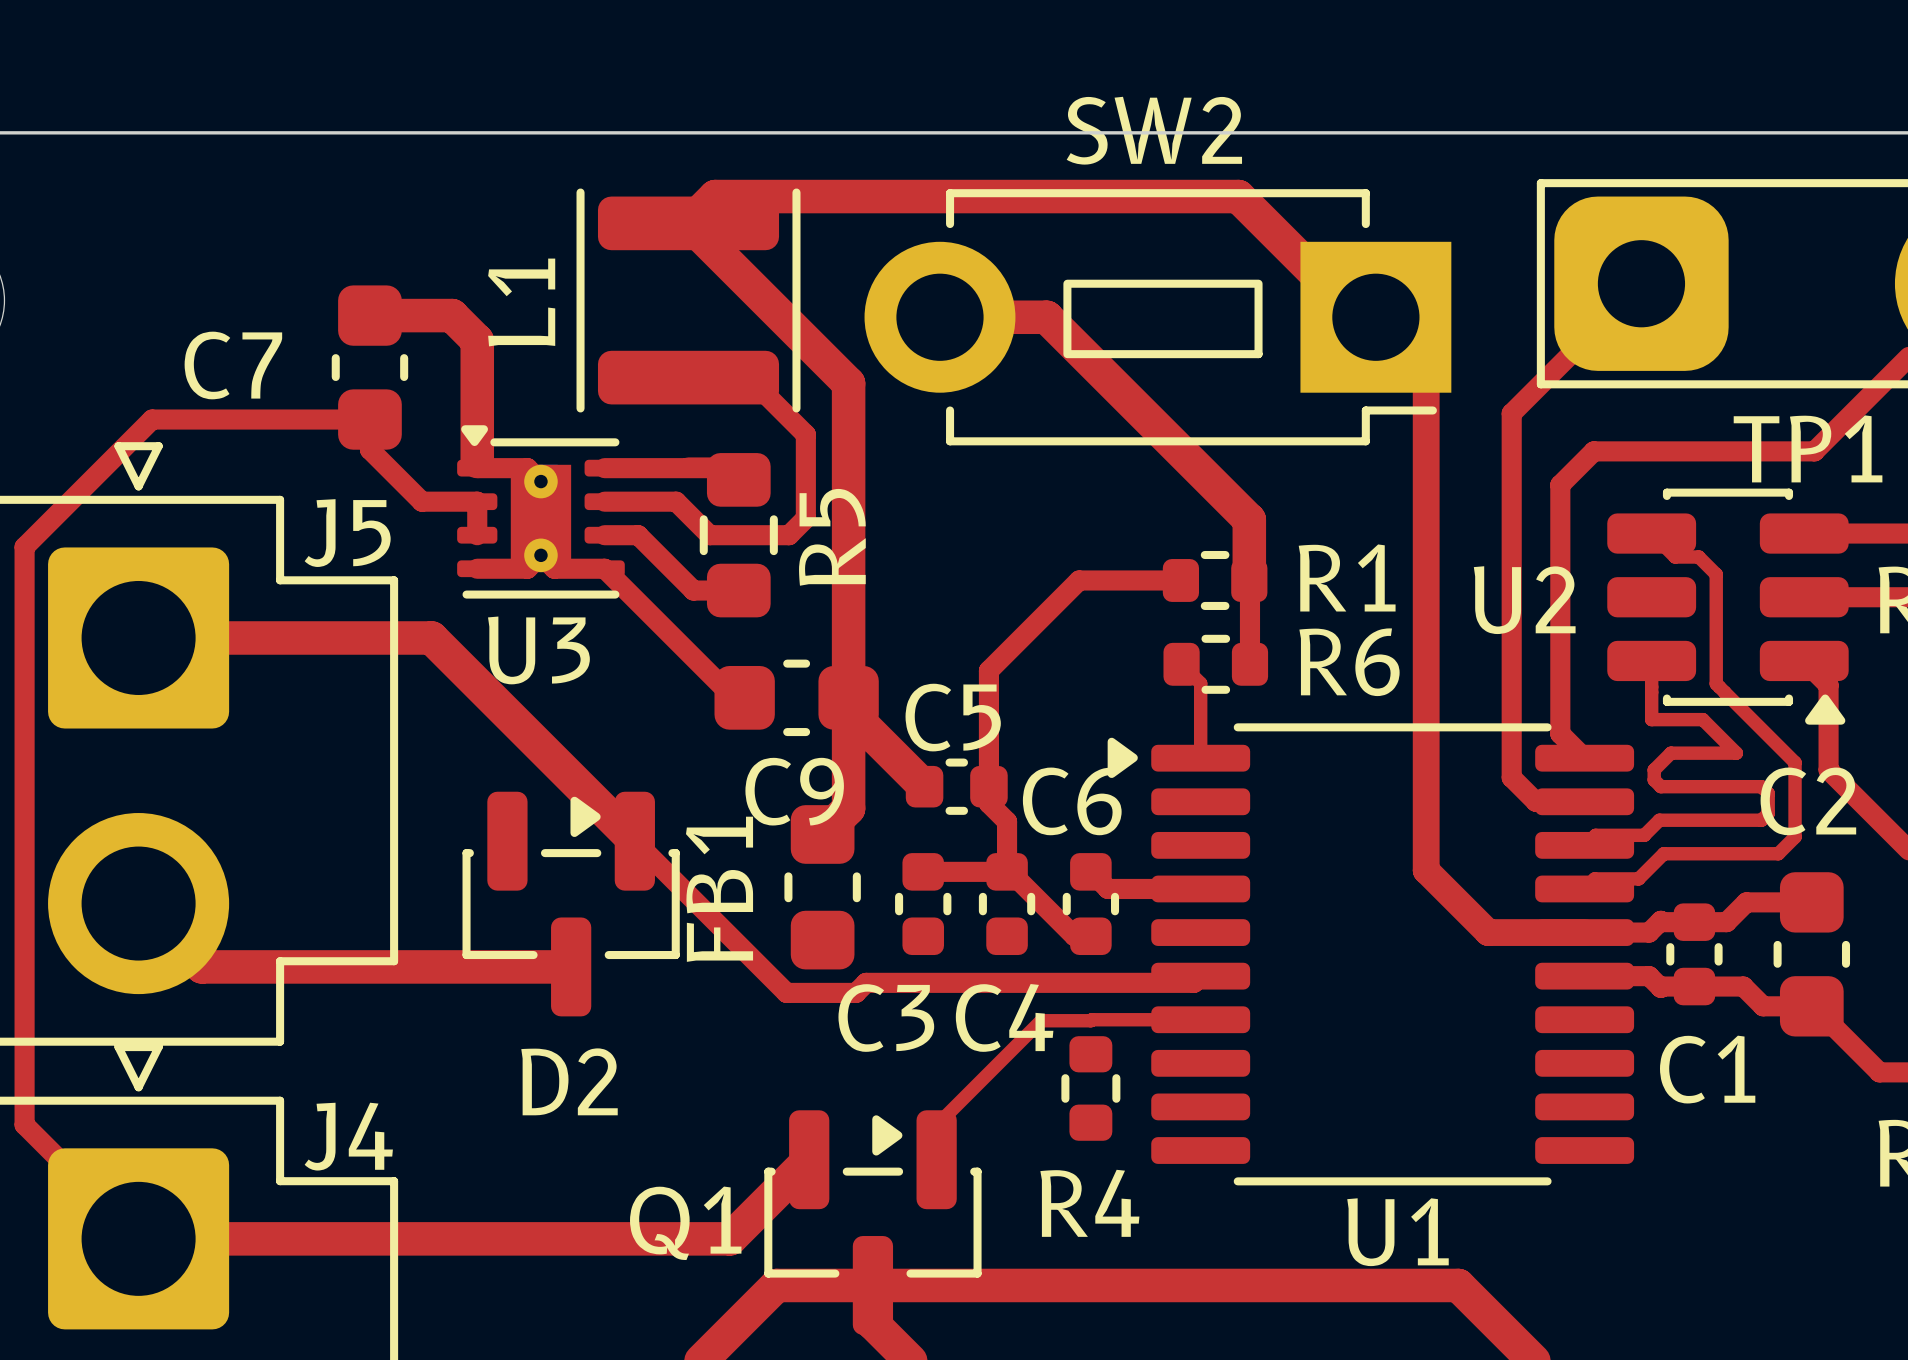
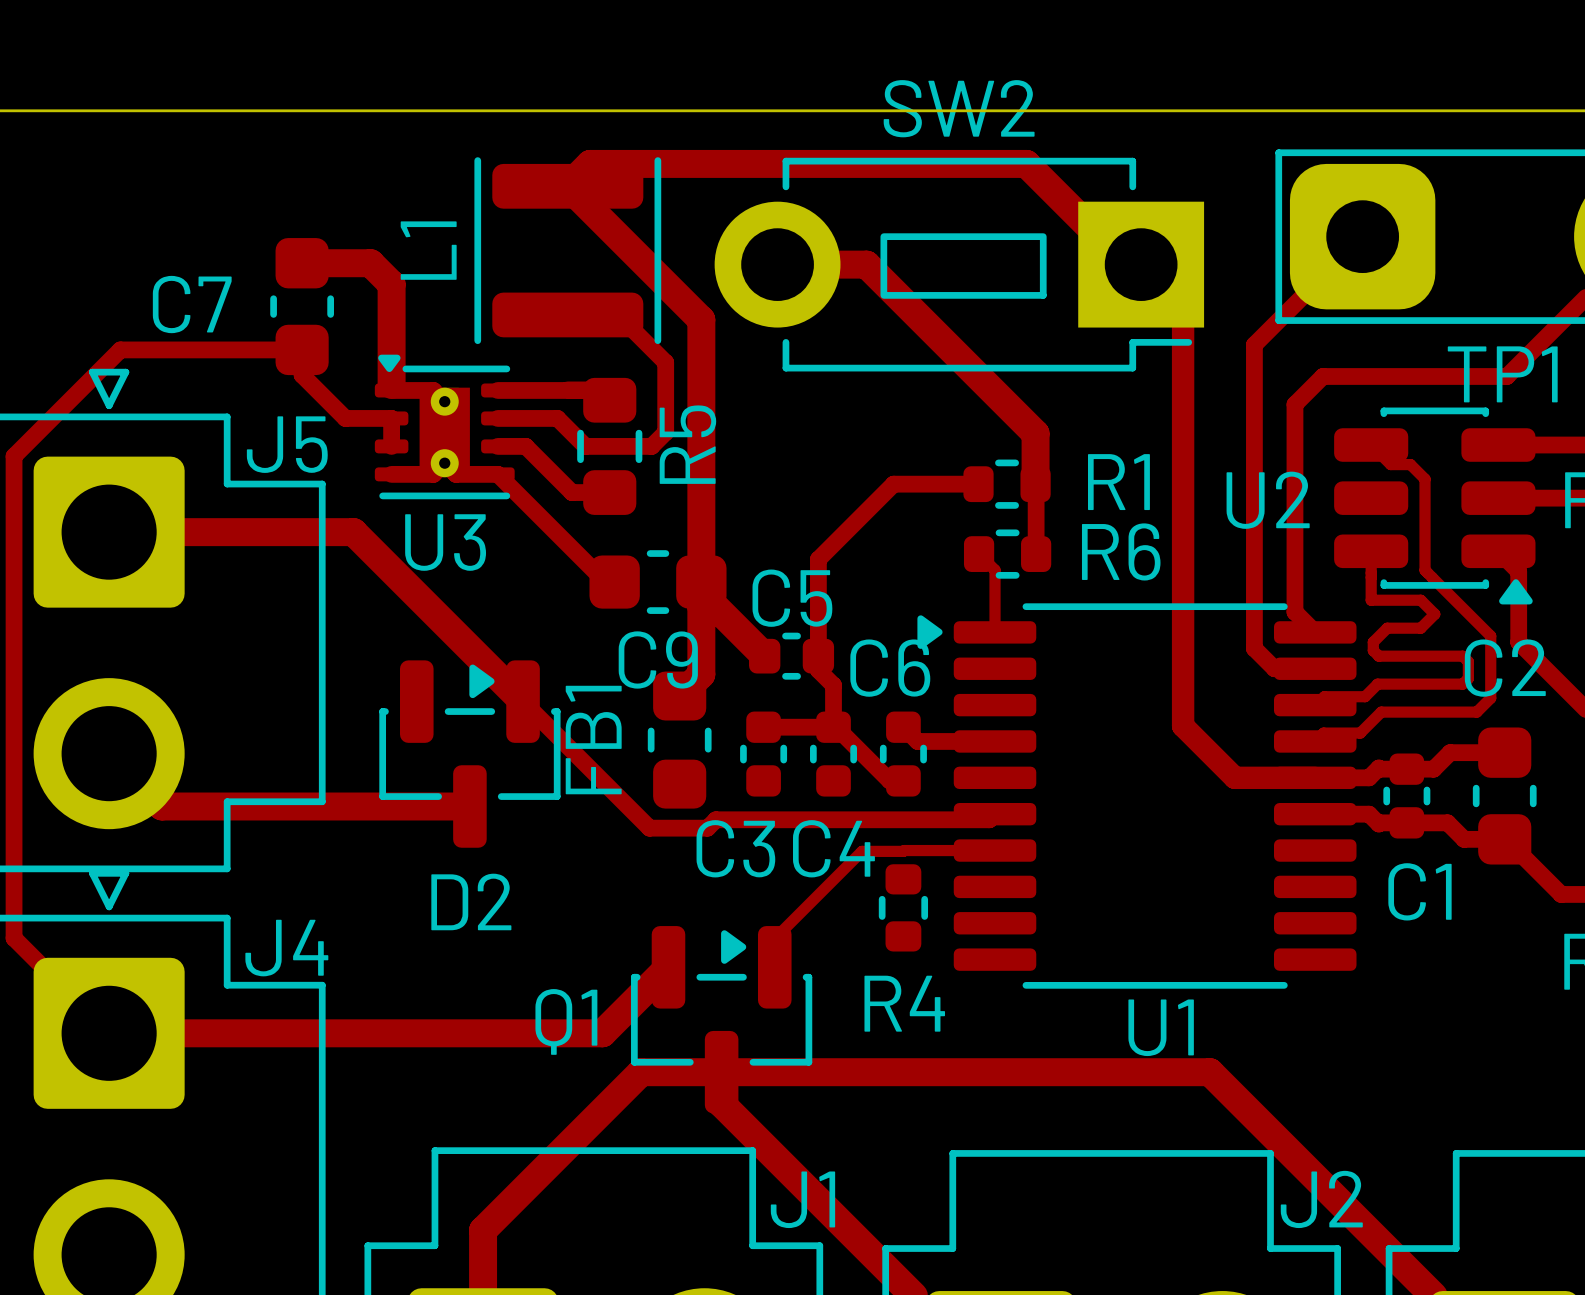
top track: (1702, 719) (1736, 753) (1711, 753) -> (1413, 600) (1420, 600) (1434, 614) (1420, 628)

